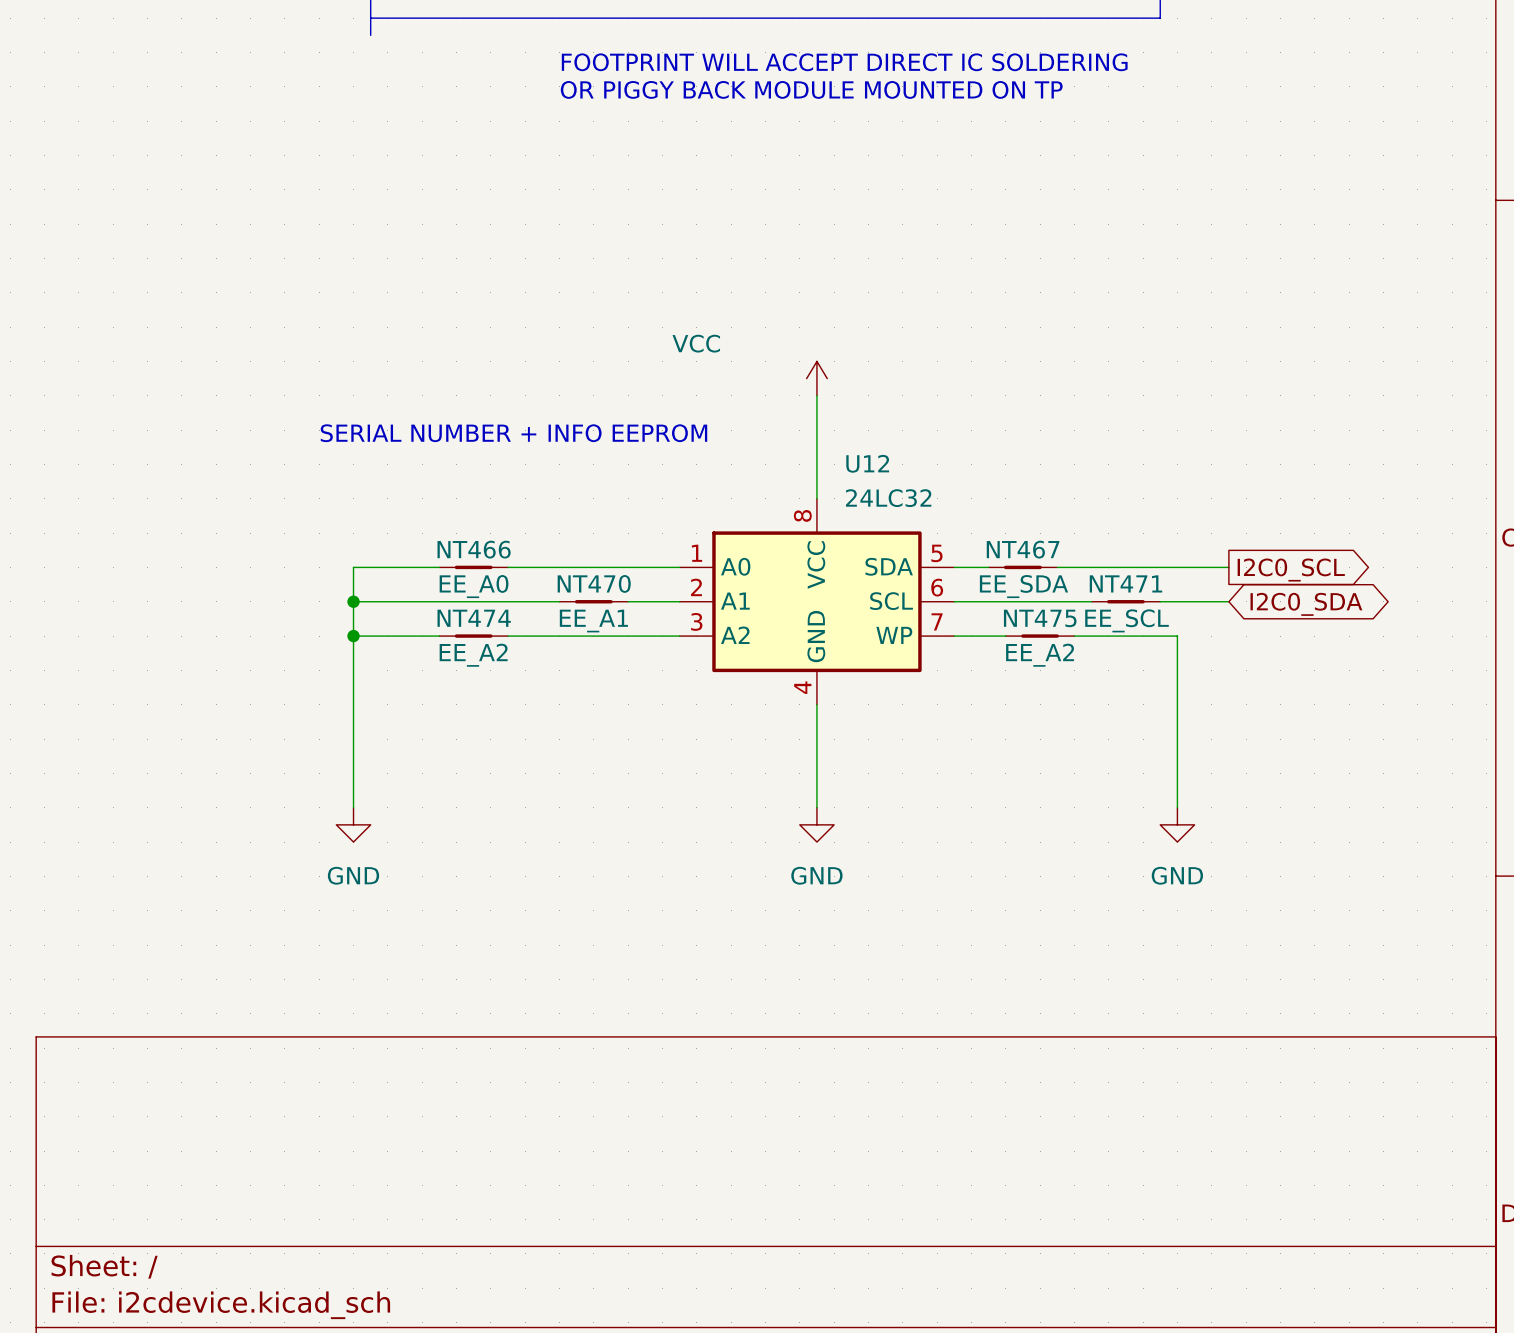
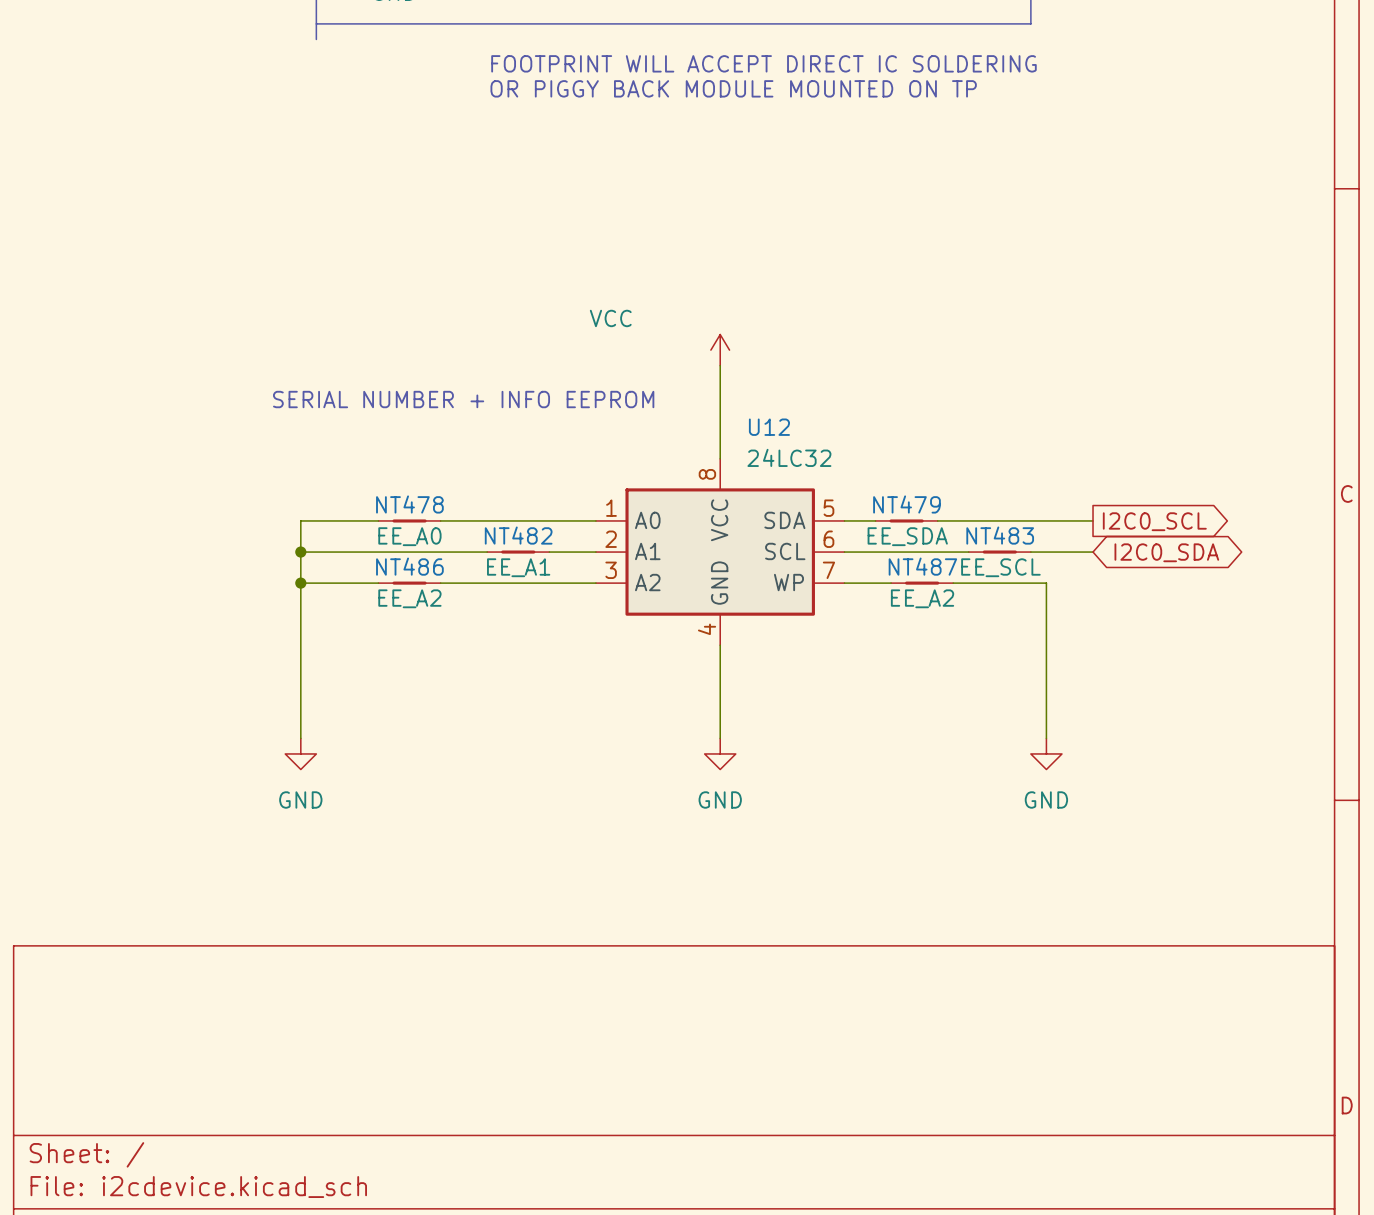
NT466 name: NT466 (474, 549) -> NT478 (409, 504)
NT467 name: NT467 (1023, 549) -> NT479 (906, 504)
NT470 name: NT470 (594, 583) -> NT482 (518, 535)
NT471 name: NT471 (1125, 583) -> NT483 (1000, 535)
NT474 name: NT474 (474, 618) -> NT486 (409, 566)
NT475 name: NT475 (1040, 618) -> NT487 (922, 566)

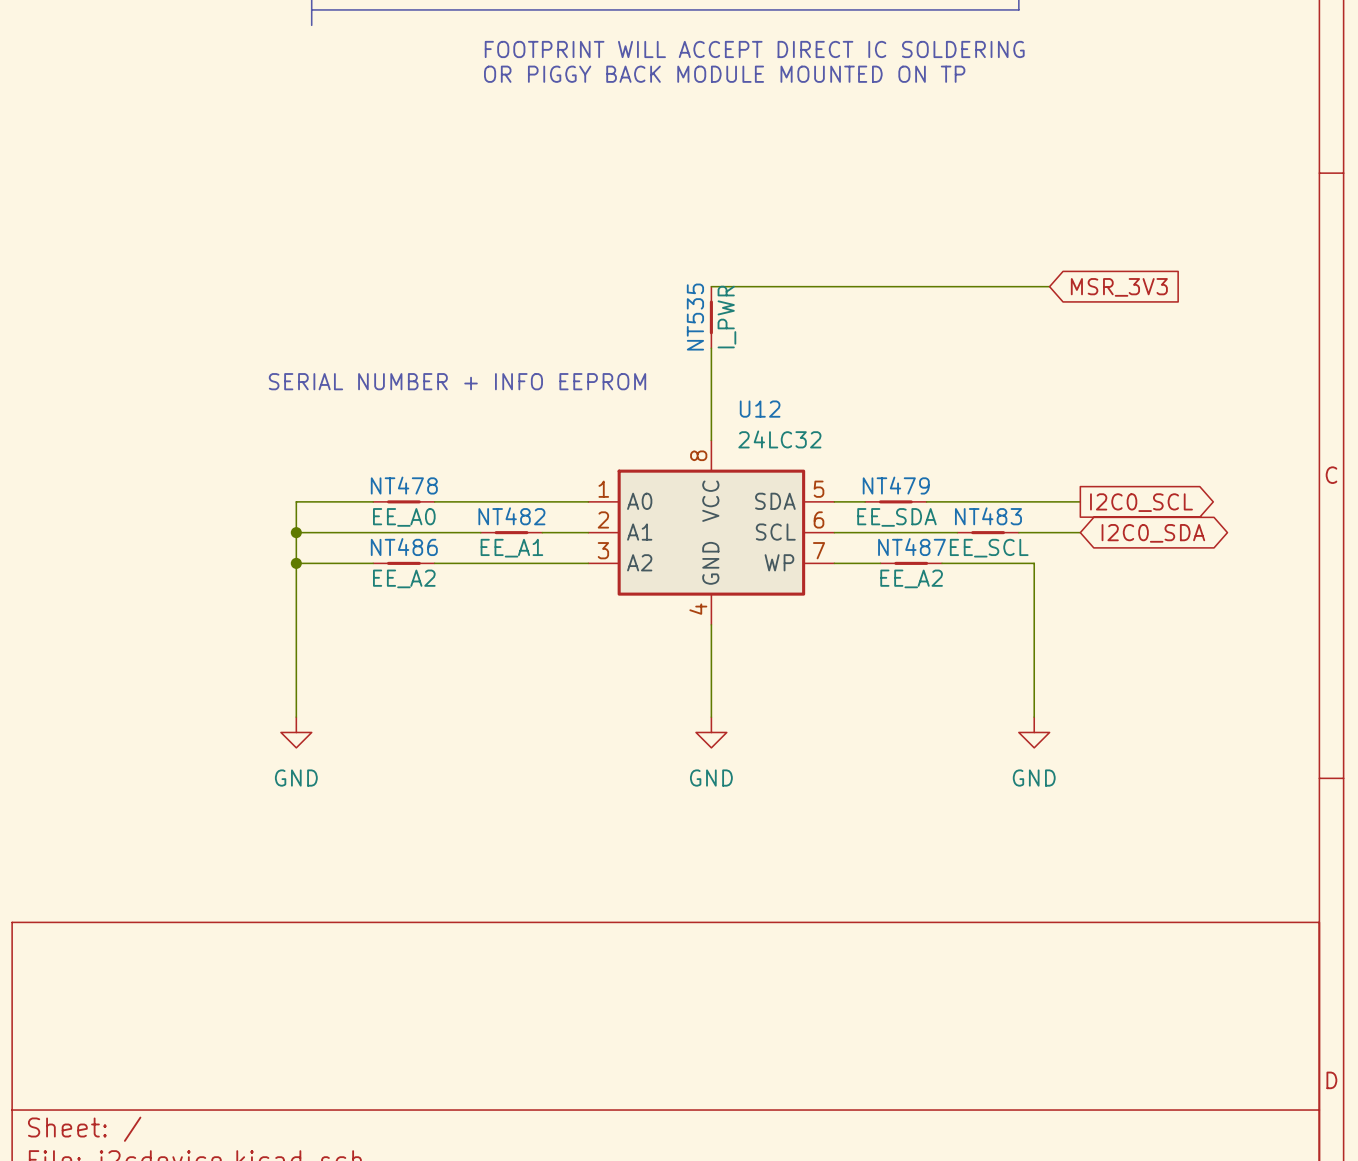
wire: none -> (711, 286) (1049, 286)
global label: none -> MSR_3V3 (1119, 287)
NT535: none -> I_PWR (711, 317)
power symbol: VCC (720, 350) -> none

